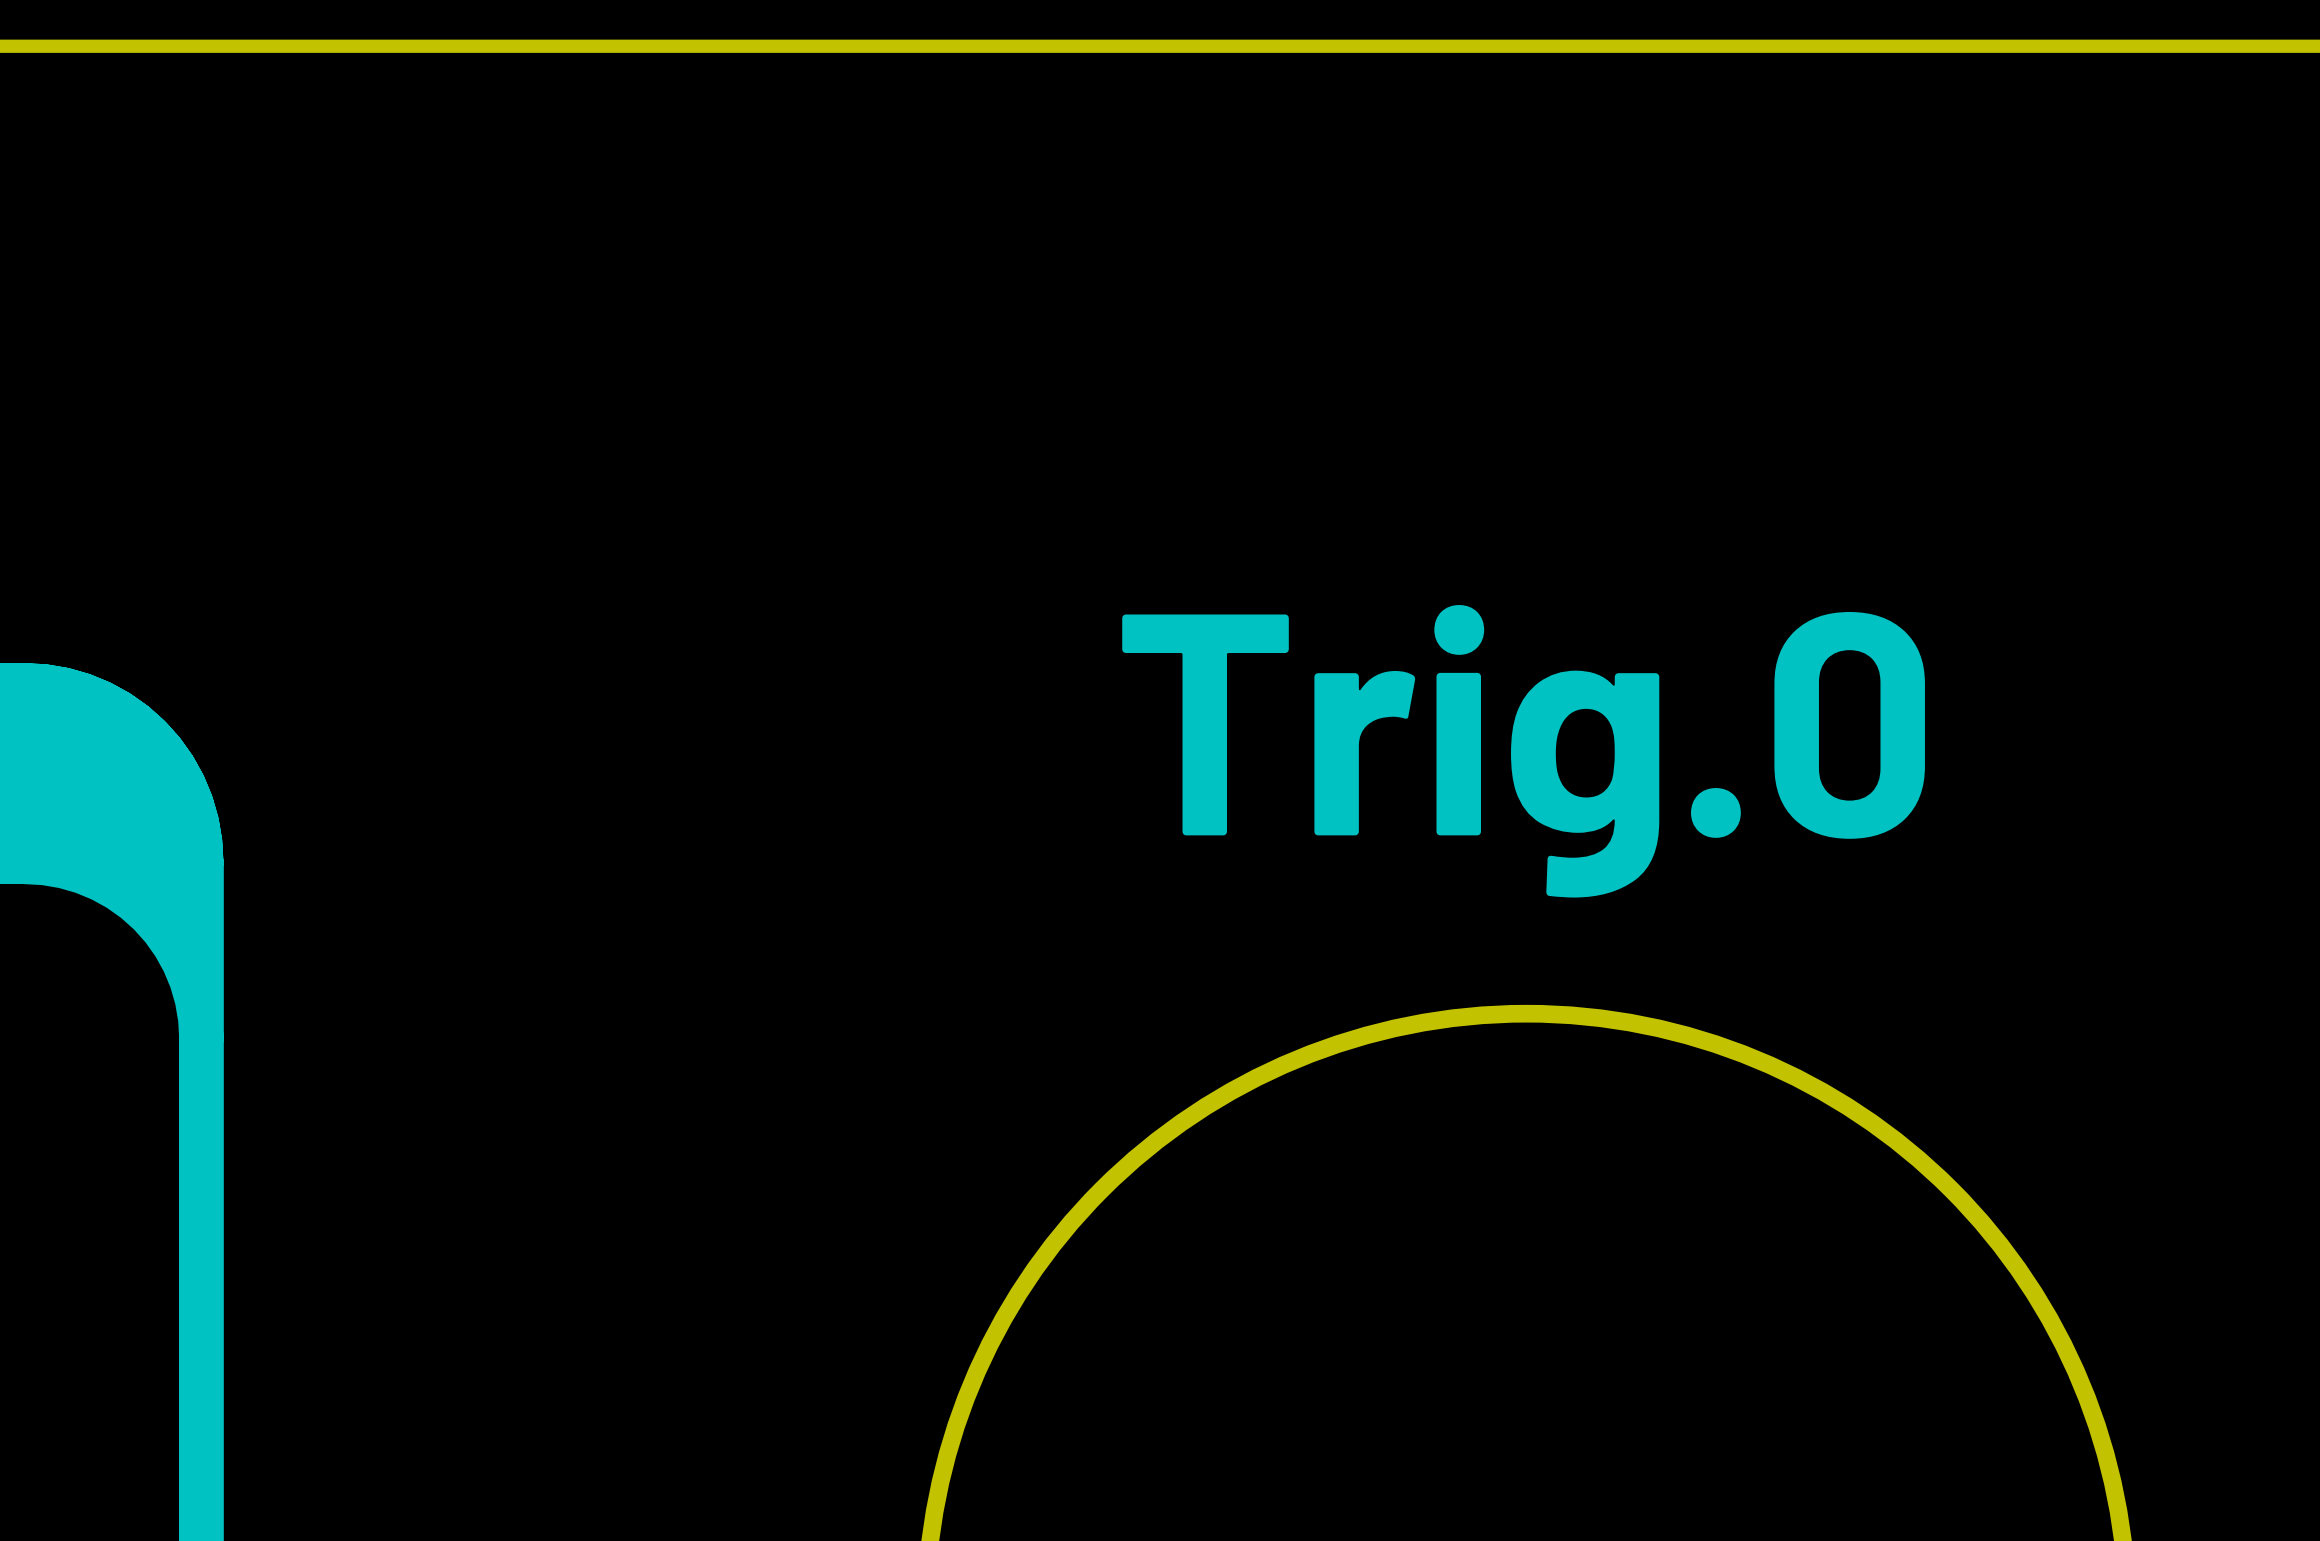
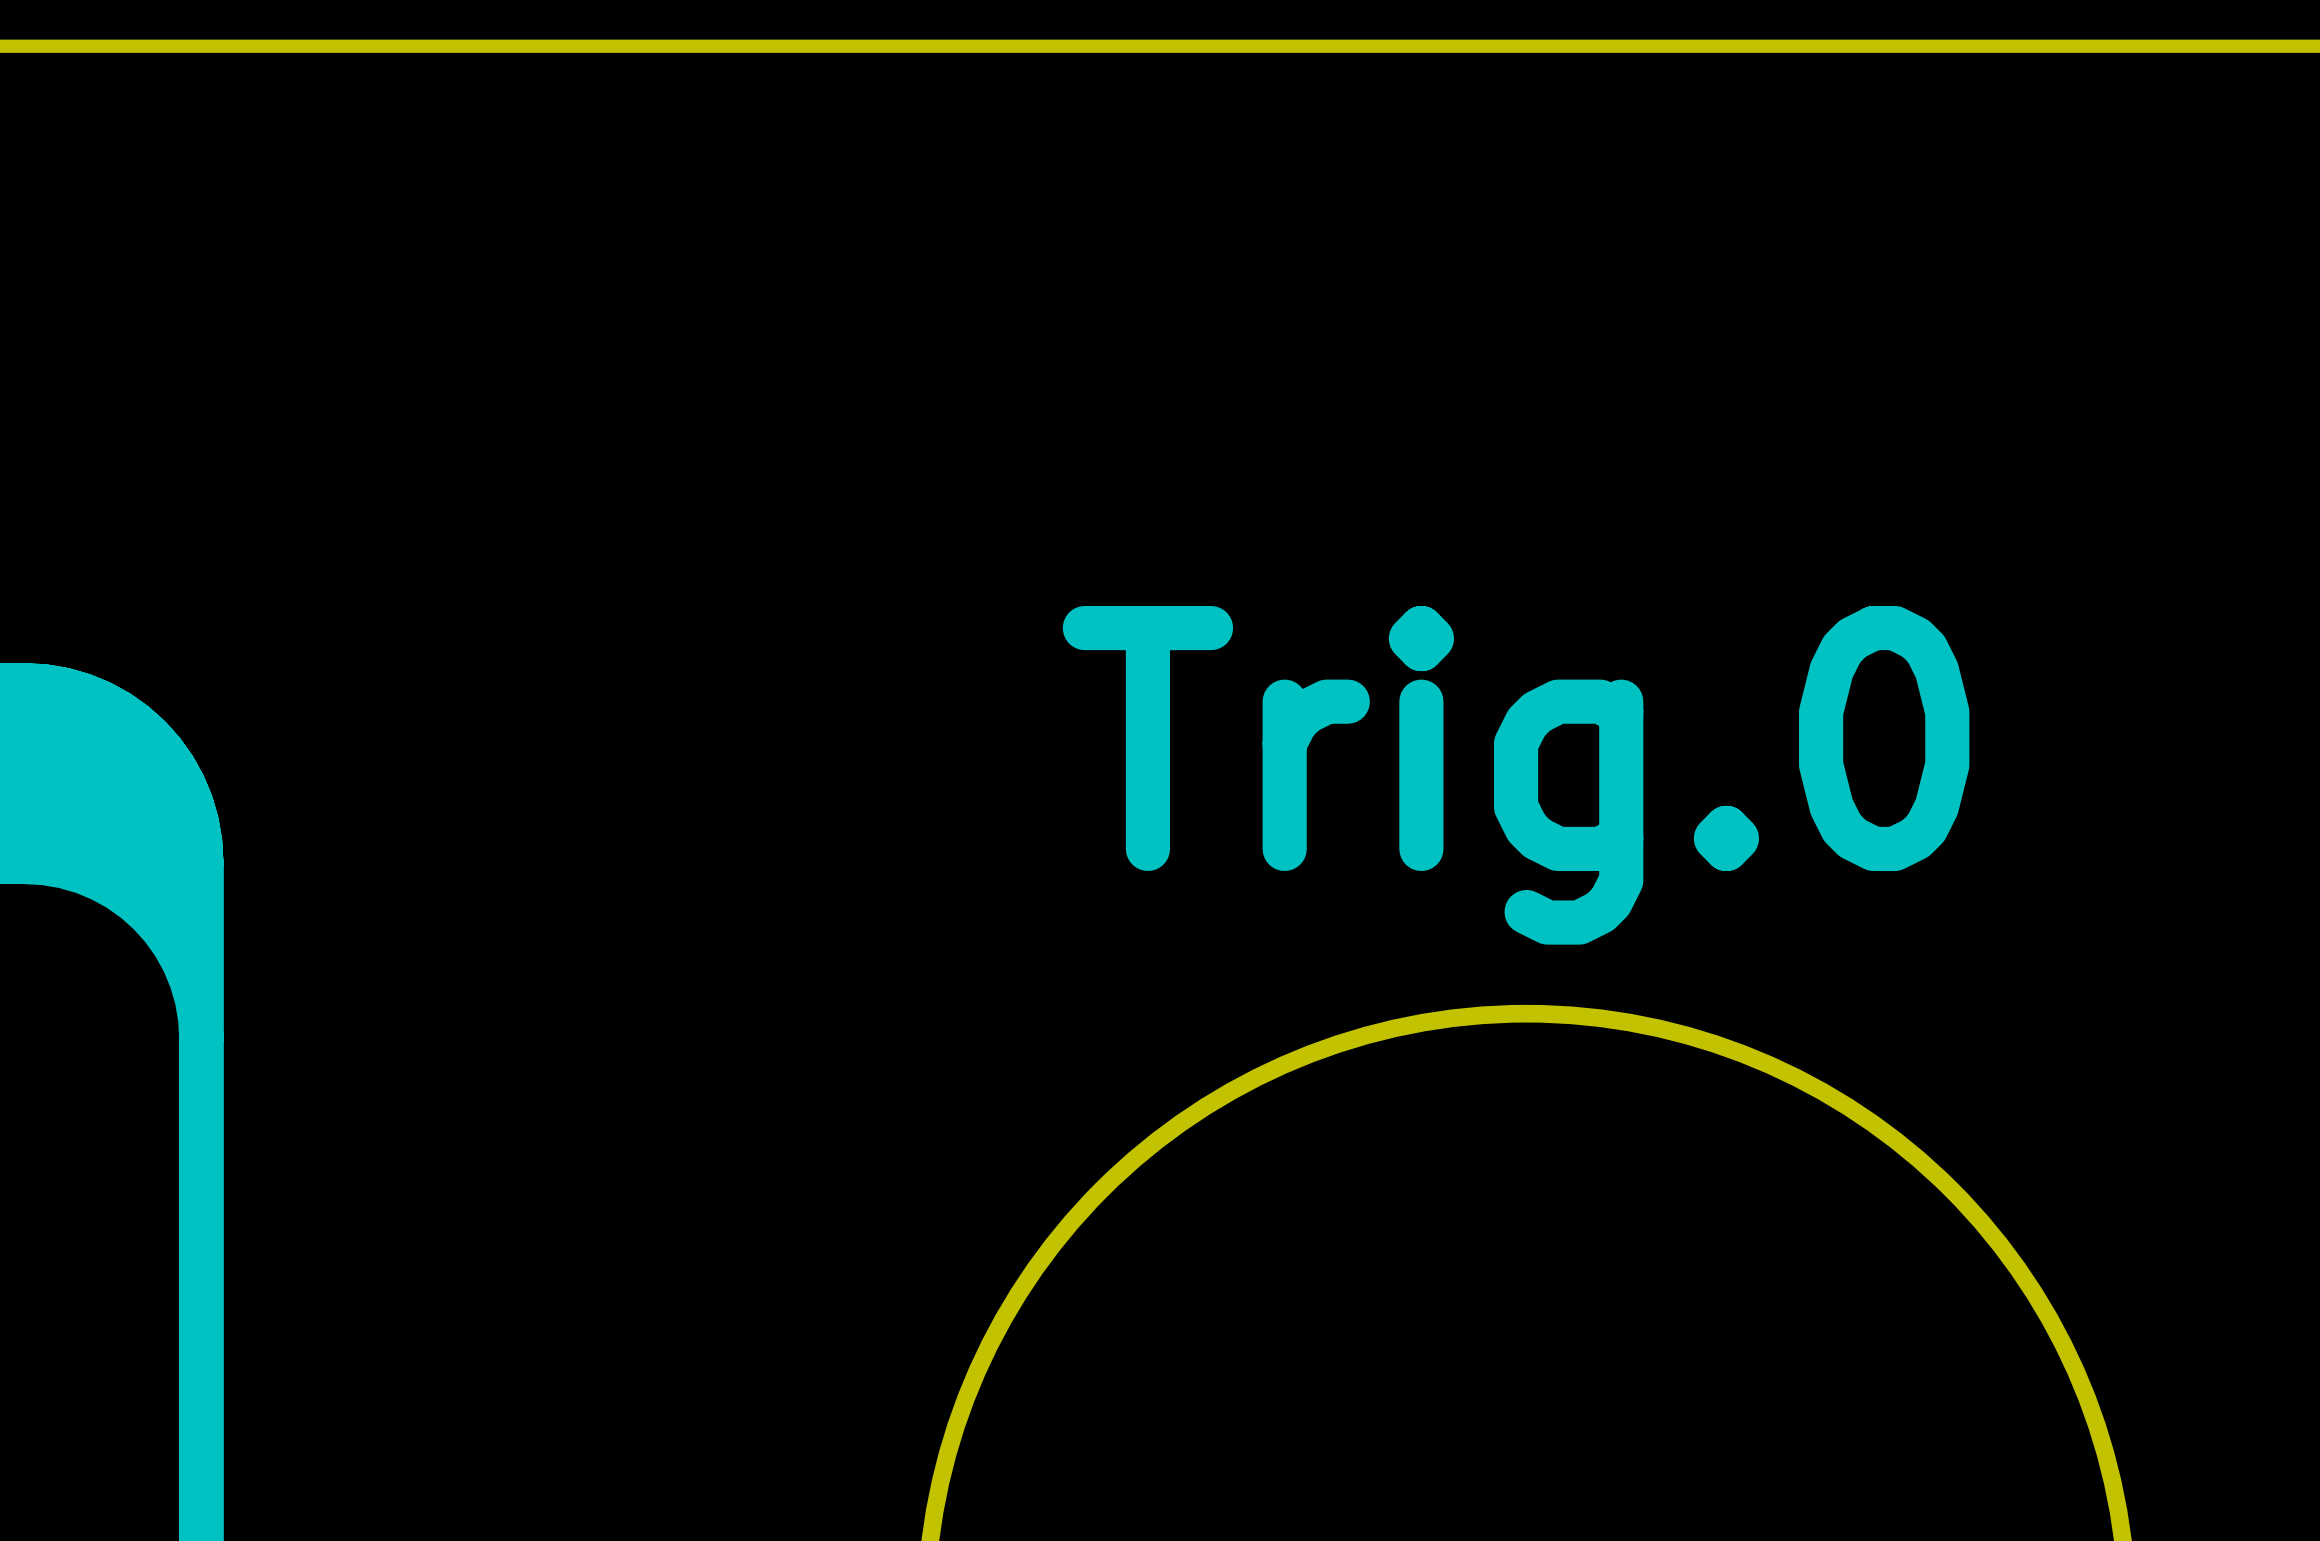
text position: Trig.0 (1523, 751) -> Trig.0 (1516, 775)

